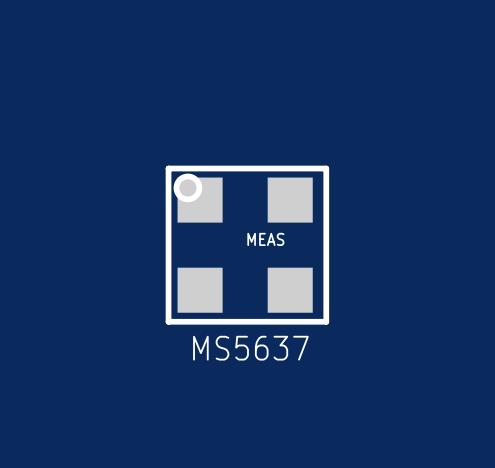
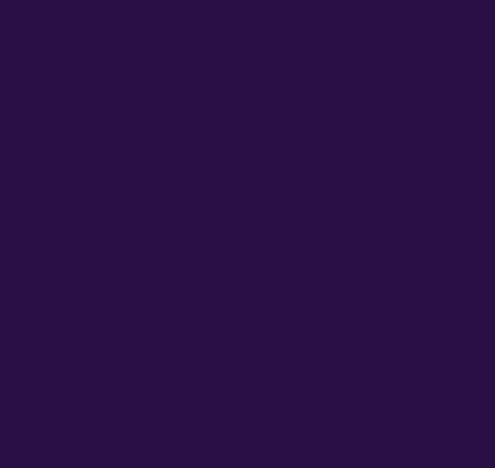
part: (247, 245) -> none

